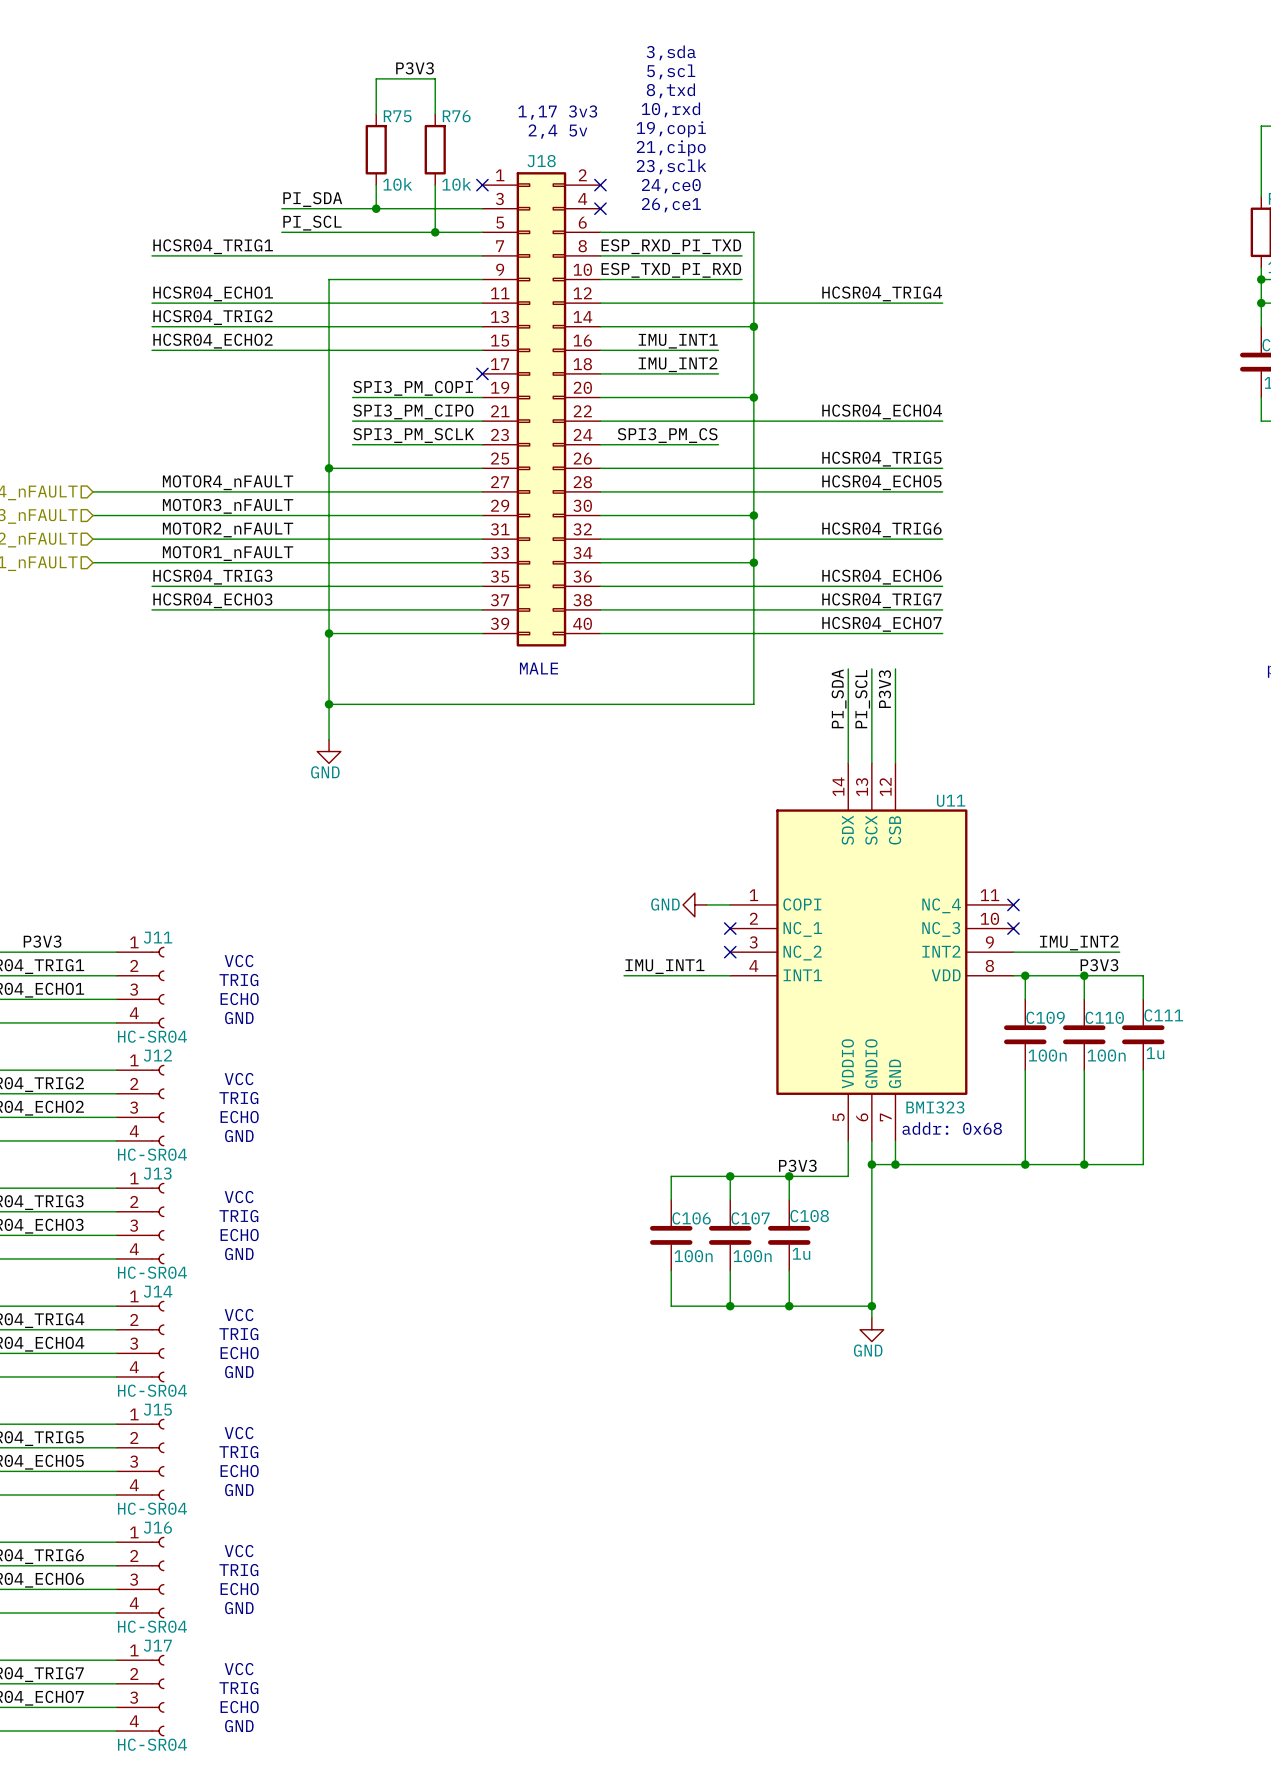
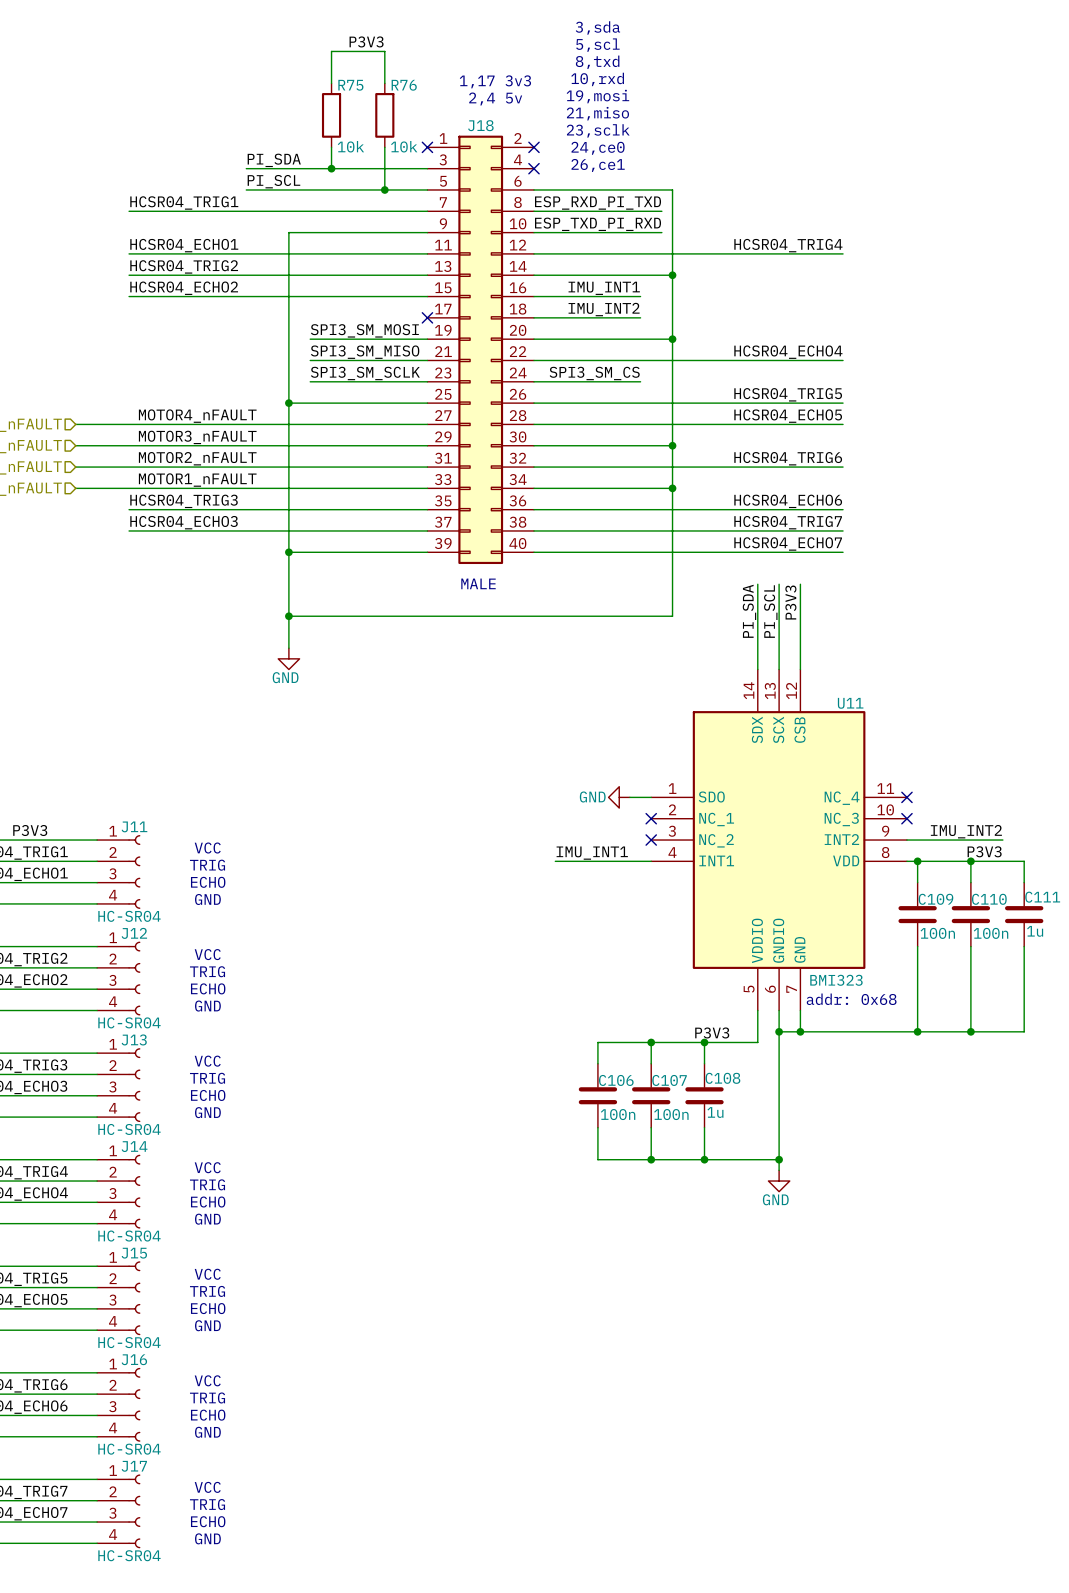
text: 19,copi (671, 129) -> 19,mosi (597, 96)
text: 21,cipo (671, 148) -> 21,miso (597, 113)
label: SPI3_PM_COPI (413, 388) -> SPI3_SM_MOSI (364, 330)
label: SPI3_PM_CIPO (413, 411) -> SPI3_SM_MISO (365, 352)
label: SPI3_PM_SCLK (413, 435) -> SPI3_SM_SCLK (365, 373)
label: SPI3_PM_CS (667, 435) -> SPI3_SM_CS (594, 373)
U11 pin name: COPI (802, 904) -> SDO (711, 796)

